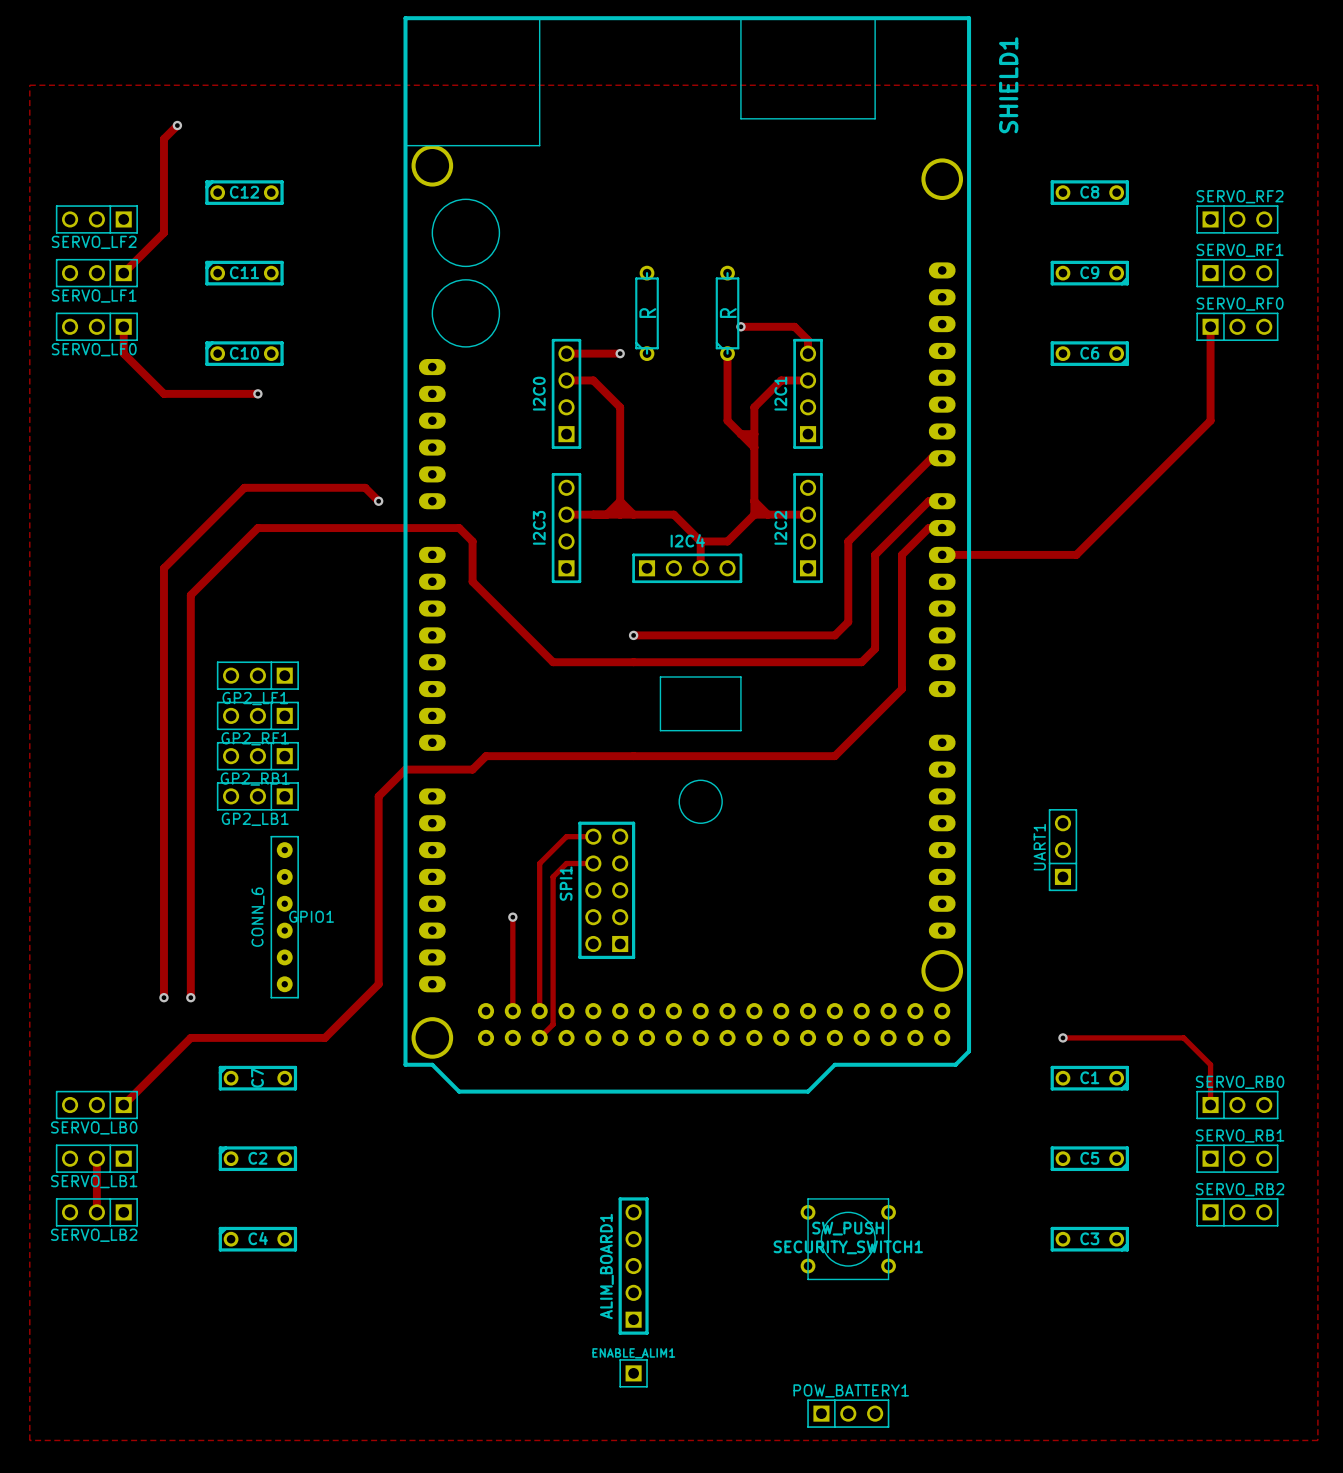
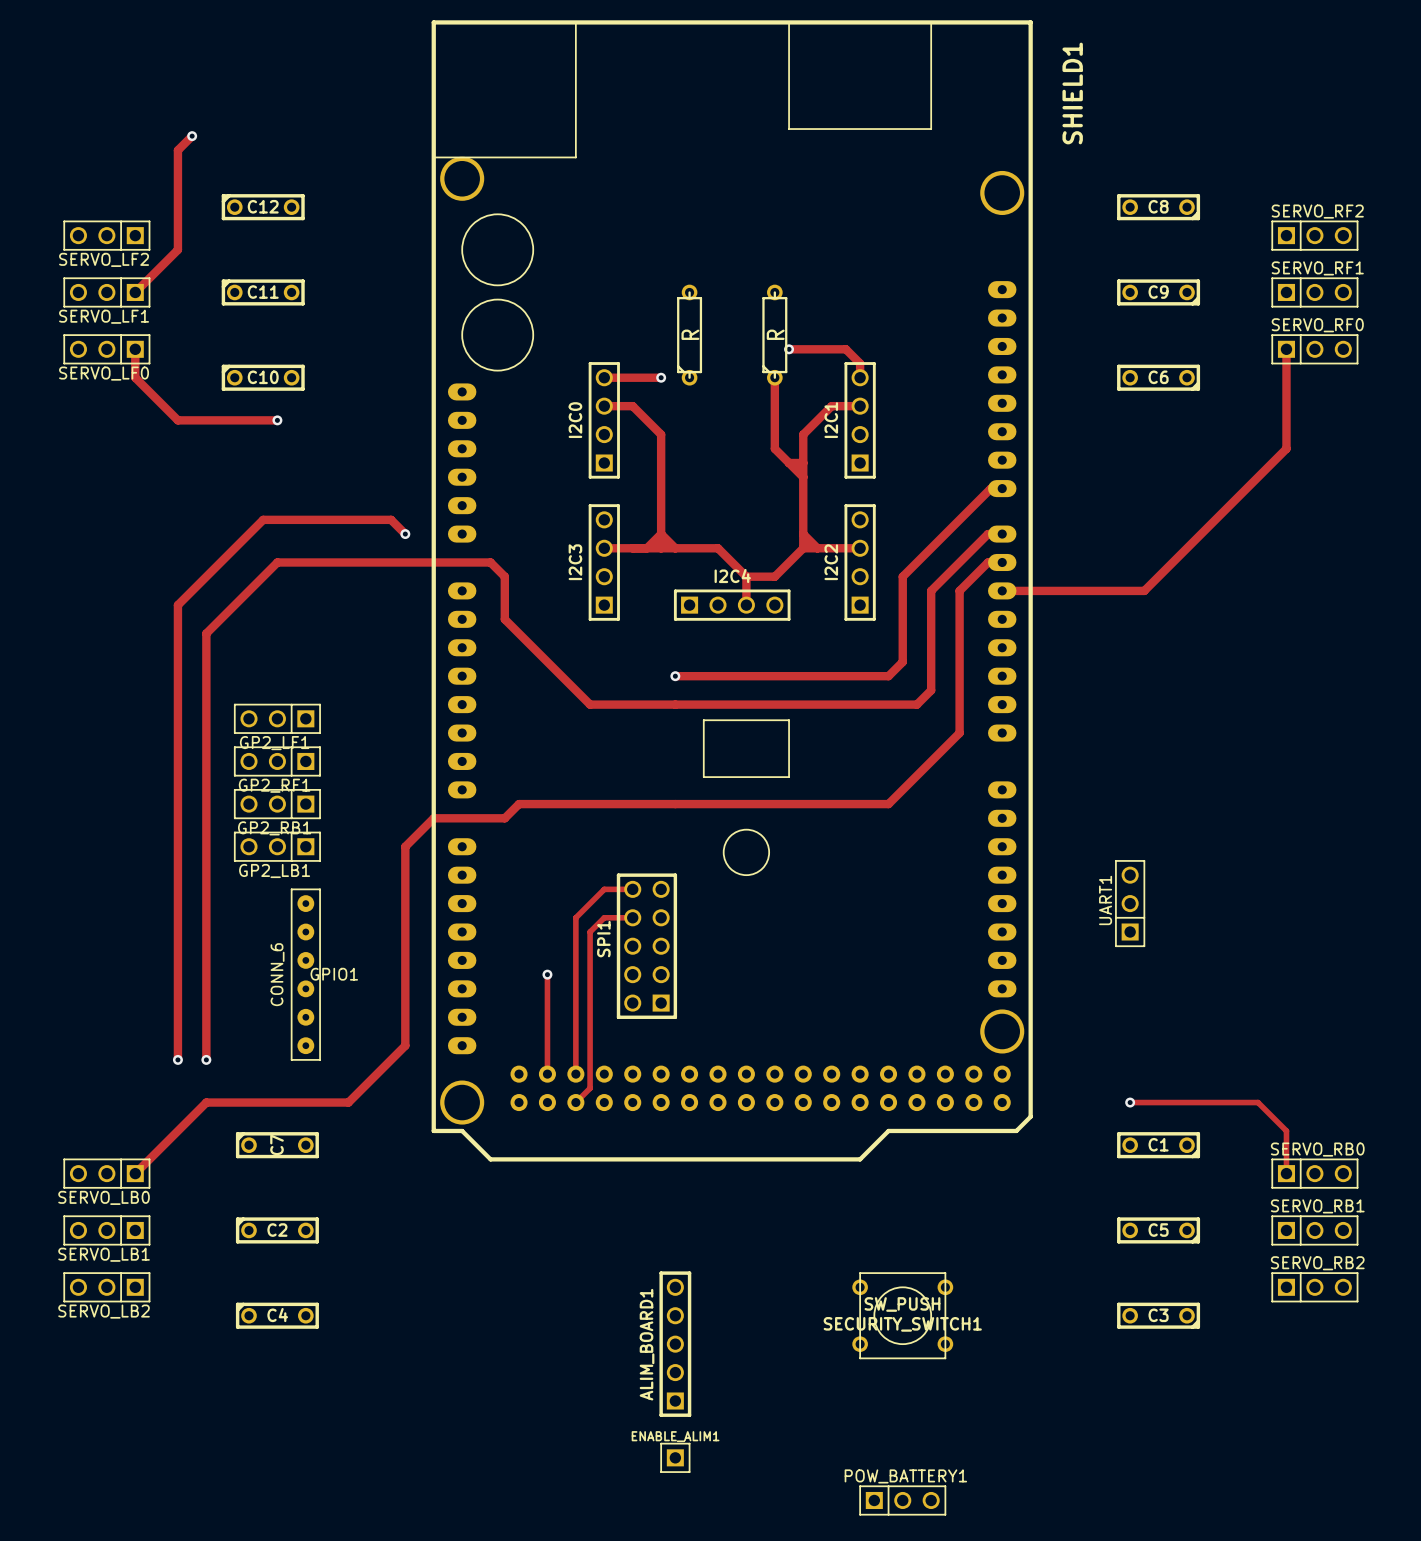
zone outline: (29, 85) (29, 1440) (1317, 1440) (1317, 85) (29, 85) -> none
track: (96, 1158) (96, 1212) -> none

